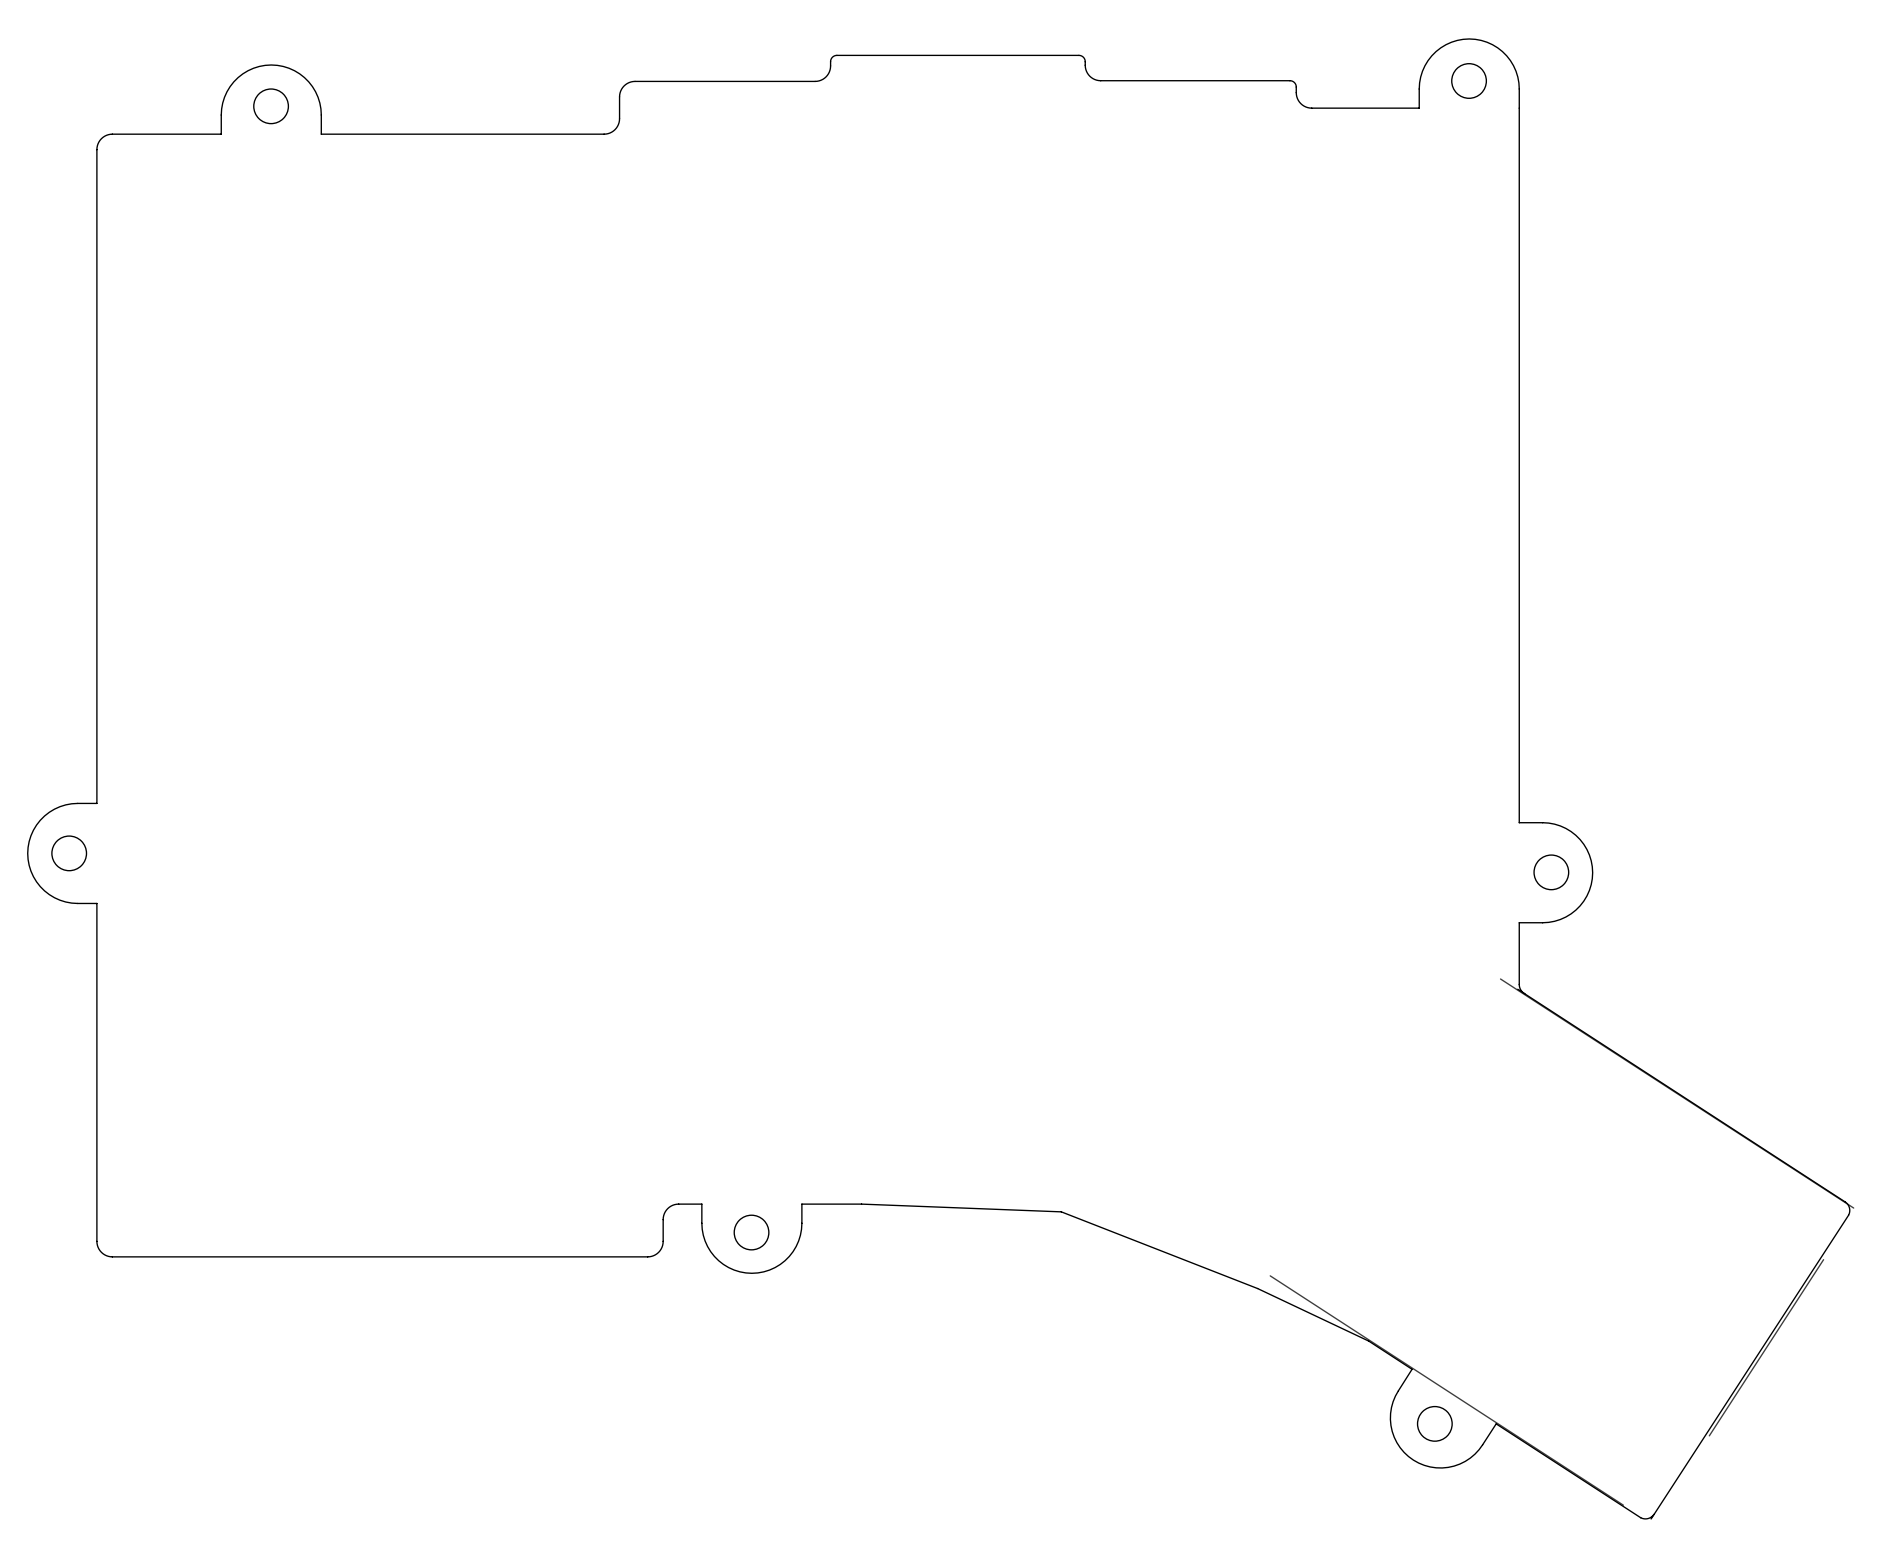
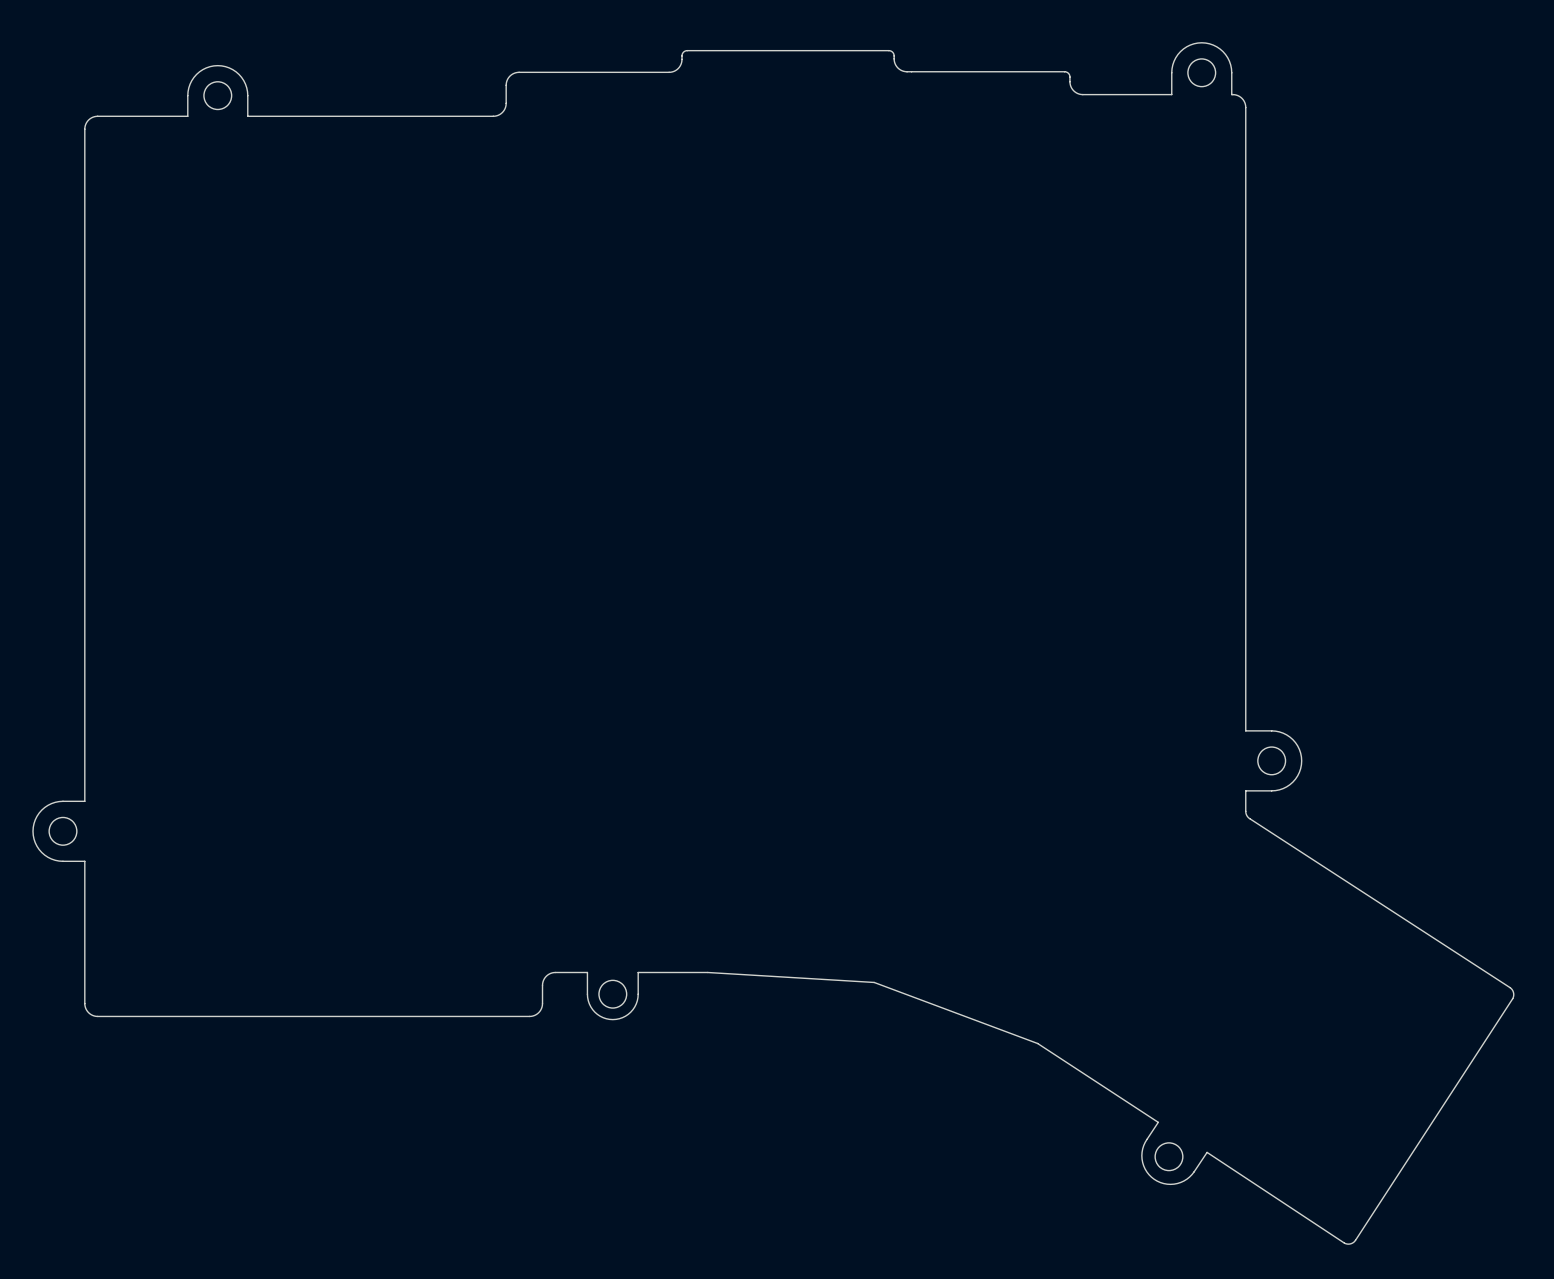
round board edge: [1451, 63, 1487, 99] -> none
round board edge: none -> [1187, 58, 1216, 87]
round board edge: [253, 88, 289, 124] -> none
round board edge: none -> [203, 81, 232, 110]
board edge: (619, 117) (620, 92) (624, 85) (631, 81) (817, 81) (827, 75) (831, 59) (836, 55) (1079, 55) (1084, 59) (1088, 74) (1098, 80) (1290, 80) (1295, 84) (1298, 100) (1307, 107) (1419, 108) (1419, 82) (1422, 71) (1431, 55) (1440, 47) (1457, 40) (1475, 39) (1492, 44) (1502, 51) (1516, 71) (1519, 88) (1519, 822) (1548, 823) (1571, 831) (1586, 849) (1592, 872) (1586, 895) (1571, 913) (1548, 922) (1519, 922) (1519, 985) (1524, 993) -> (506, 85) (509, 76) (517, 72) (670, 72) (679, 67) (682, 53) (686, 50) (888, 50) (893, 53) (896, 66) (905, 71) (1065, 71) (1069, 75) (1071, 88) (1079, 94) (1171, 94) (1172, 65) (1177, 54) (1183, 48) (1193, 43) (1205, 43) (1216, 46) (1222, 51) (1230, 65) (1231, 94) (1241, 98) (1245, 107) (1245, 730) (1275, 731) (1286, 734) (1297, 745) (1301, 760) (1297, 775) (1286, 786) (1275, 790) (1245, 790) (1246, 814) (1249, 818) (1509, 987) (1513, 994) (1355, 1240) (1348, 1244) (1207, 1152) (1192, 1174) (1183, 1181) (1170, 1184) (1157, 1181) (1146, 1172) (1141, 1155) (1145, 1142) (1158, 1122) (1037, 1043) (874, 982) (707, 972) (638, 972) (637, 997) (634, 1006) (625, 1016) (612, 1019) (600, 1016) (590, 1006) (587, 997) (587, 972) (555, 972) (547, 975) (543, 980) (542, 1002)
board edge: (619, 118) (615, 129) (604, 134) (321, 134) (319, 103) (312, 86) (294, 70) (271, 64) (248, 70) (230, 86) (222, 103) (221, 134) (112, 134) (104, 136) (100, 140) (96, 149) (96, 803) (65, 804) (49, 812) (33, 830) (27, 853) (33, 876) (49, 894) (65, 902) (96, 903) (96, 1241) (98, 1249) (104, 1254) (112, 1256) (647, 1256) (657, 1253) (661, 1247) (663, 1220) -> (506, 85) (505, 108) (501, 113) (494, 116) (247, 116) (247, 91) (241, 77) (229, 67) (213, 65) (202, 69) (191, 80) (188, 91) (187, 116) (97, 116) (91, 118) (86, 122) (84, 129) (84, 801) (59, 801) (47, 805) (37, 816) (33, 831) (37, 846) (47, 857) (59, 861) (84, 861) (84, 1003) (87, 1011) (94, 1016) (529, 1016) (538, 1012) (542, 1003)
round board edge: [51, 835, 87, 871] -> none
round board edge: [1533, 854, 1569, 890] -> none
round board edge: none -> [1257, 746, 1286, 775]
line: (1500, 979) (1853, 1208) -> none
board edge: (1517, 989) (1845, 1202) (1849, 1207) (1848, 1215) (1651, 1518) -> none
round board edge: none -> [48, 817, 78, 846]
round board edge: none -> [598, 980, 627, 1009]
round board edge: [733, 1214, 770, 1251] -> none
board edge: (663, 1219) (665, 1211) (672, 1205) (701, 1204) (703, 1235) (710, 1251) (728, 1267) (751, 1273) (775, 1267) (793, 1251) (800, 1235) (801, 1204) (861, 1204) (1061, 1211) (1257, 1288) (1368, 1341) (1412, 1369) (1395, 1396) (1390, 1419) (1396, 1442) (1408, 1456) (1418, 1463) (1442, 1467) (1465, 1461) (1479, 1449) (1496, 1423) (1640, 1517) (1647, 1518) (1653, 1514) -> none
line: (1823, 1259) (1709, 1435) -> none
line: (1270, 1275) (1623, 1505) -> none
round board edge: none -> [1154, 1142, 1184, 1171]
round board edge: [1417, 1406, 1453, 1442] -> none

